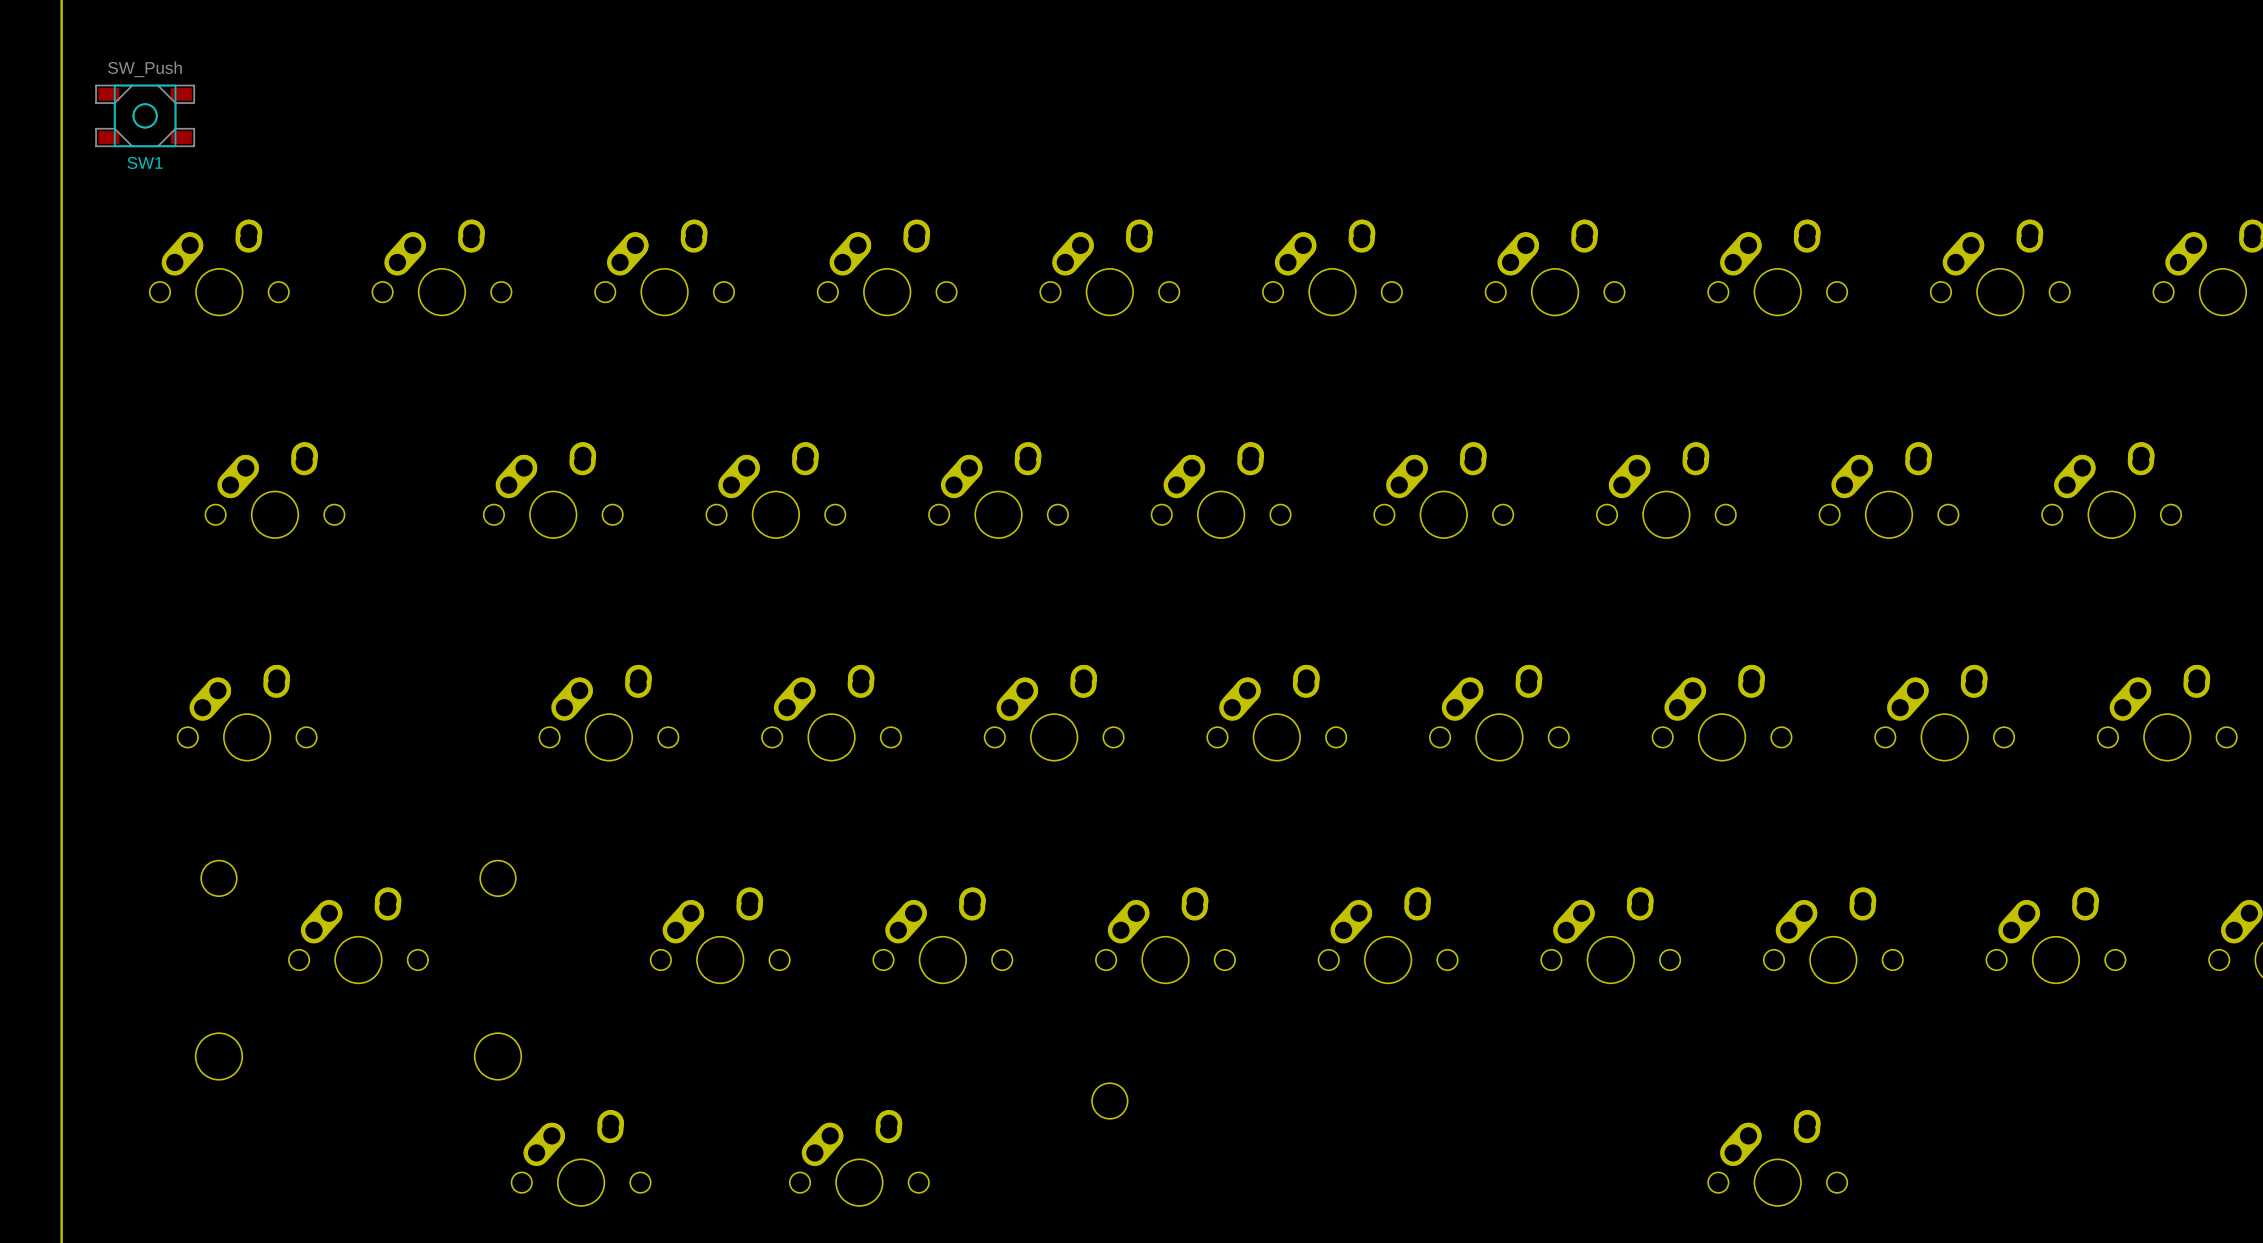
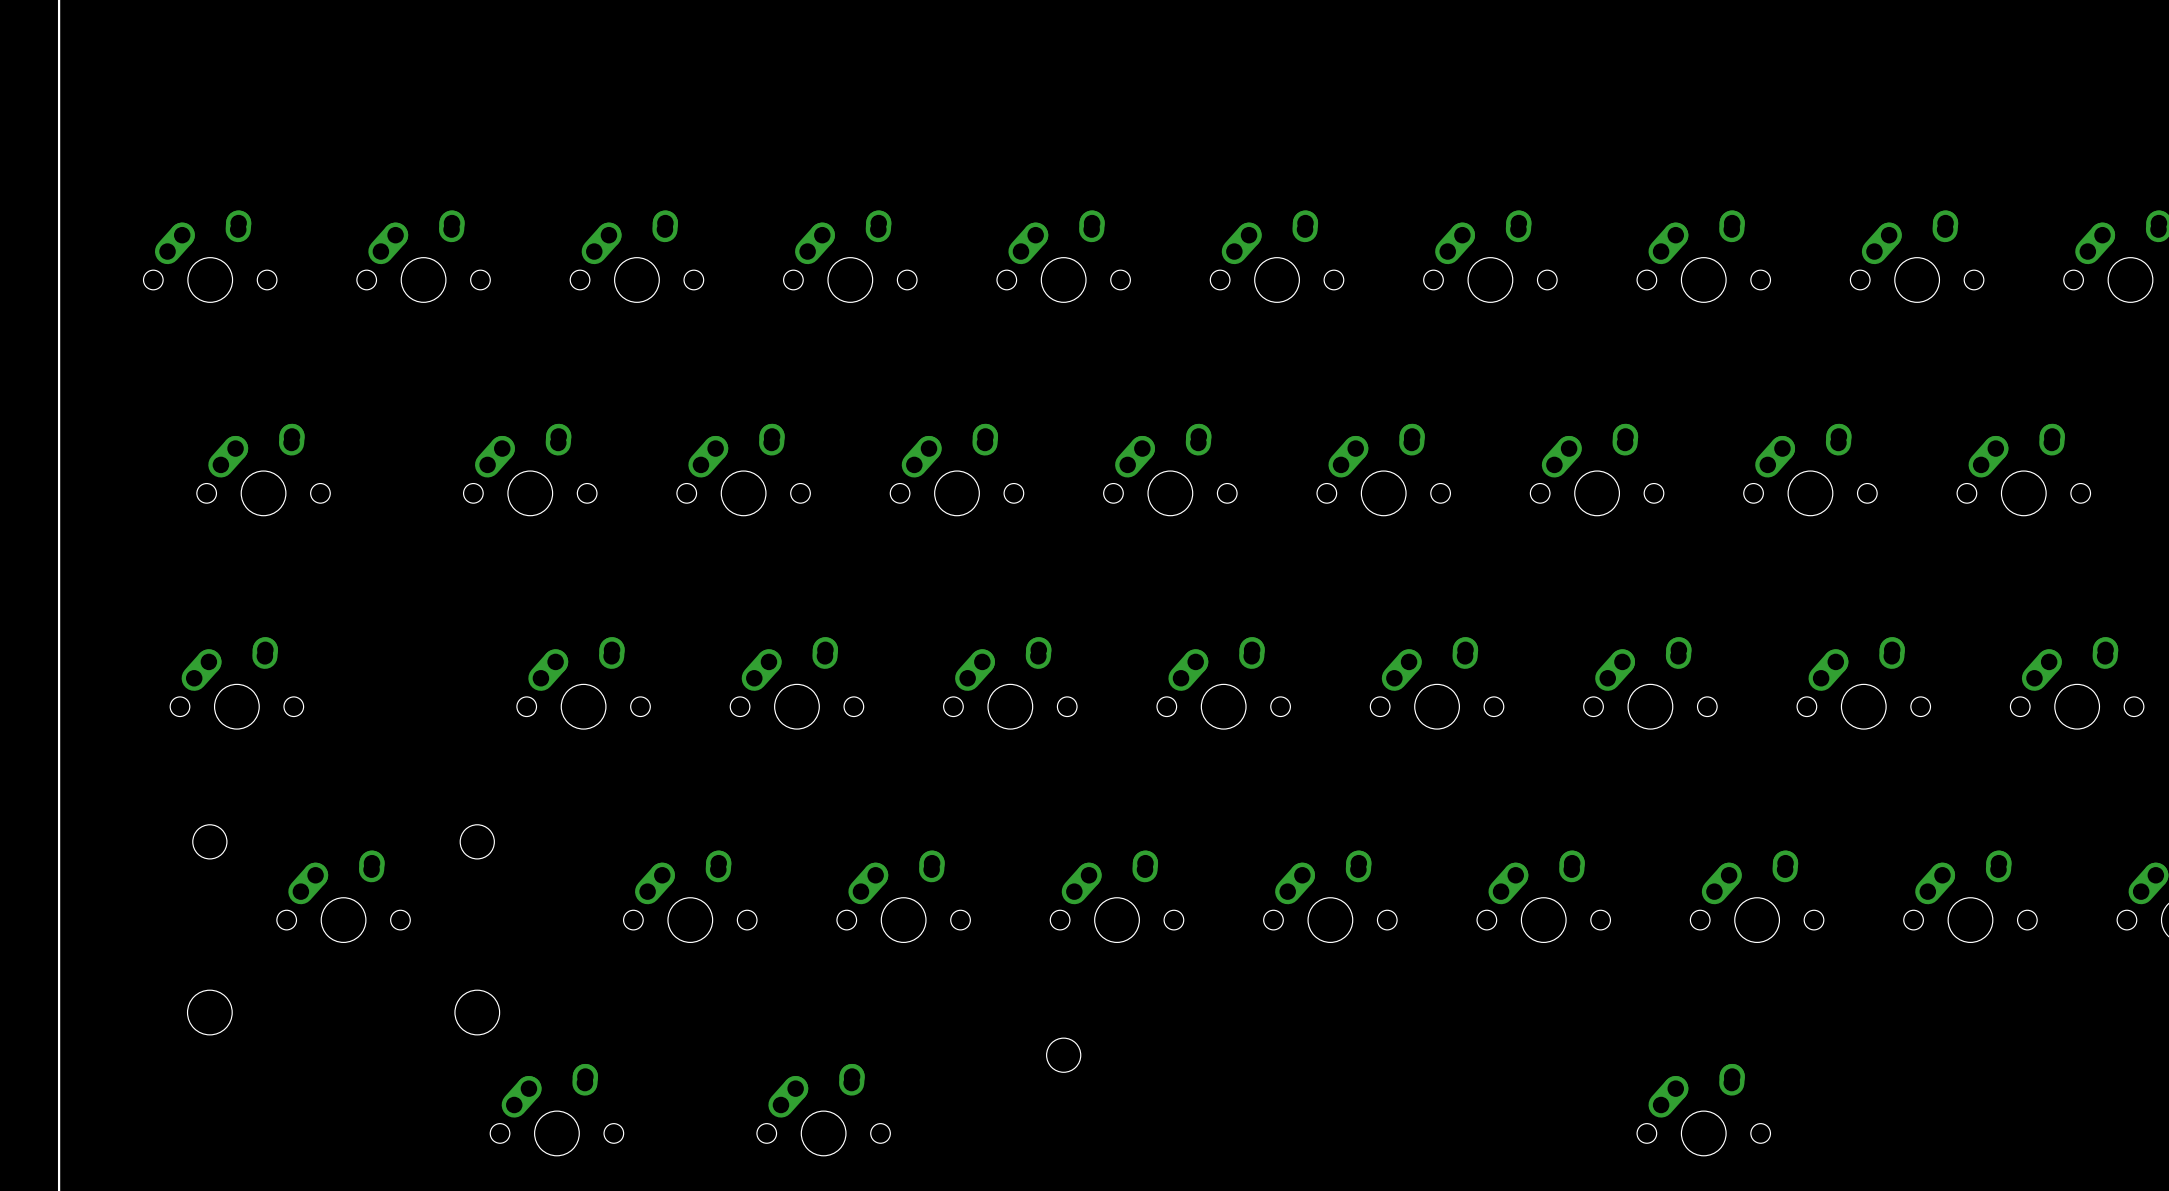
SW1: SW_Push (145, 115) -> none

